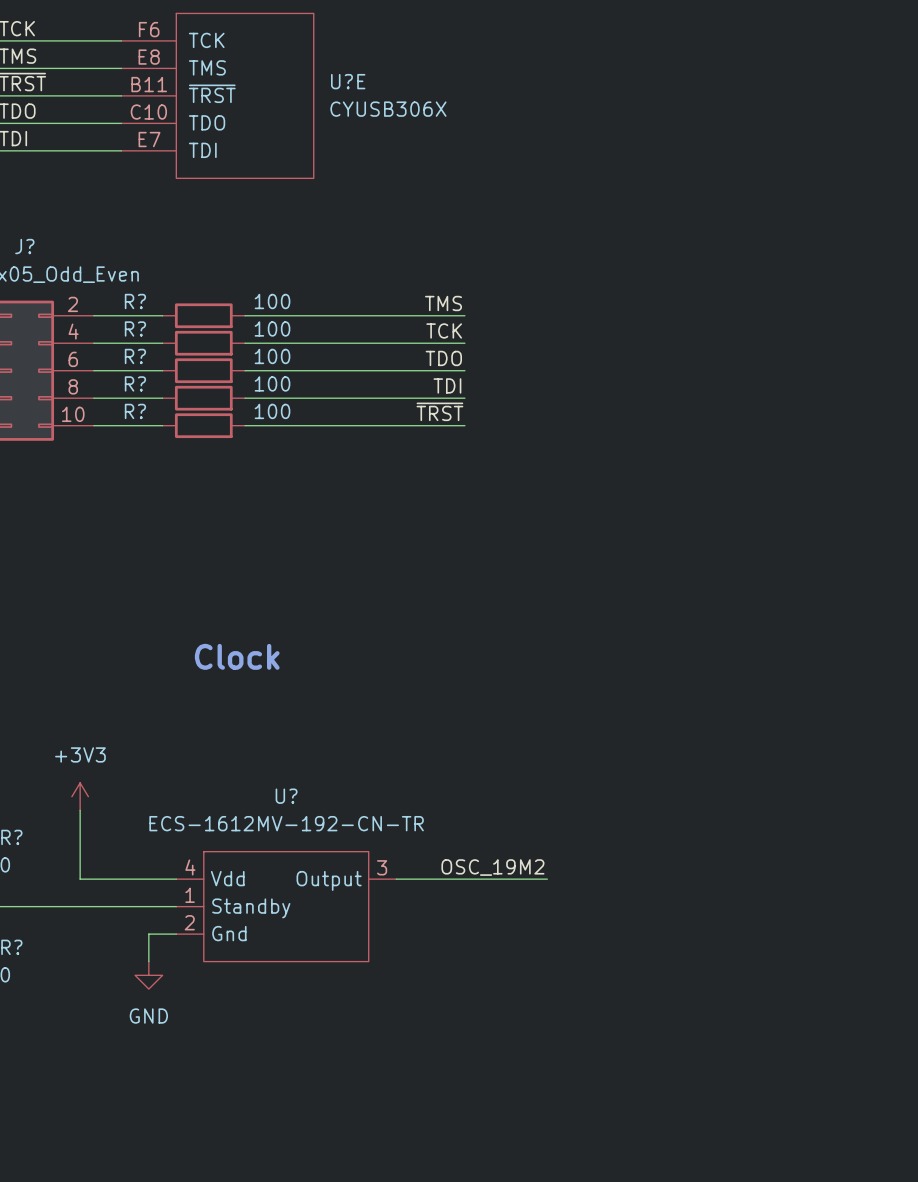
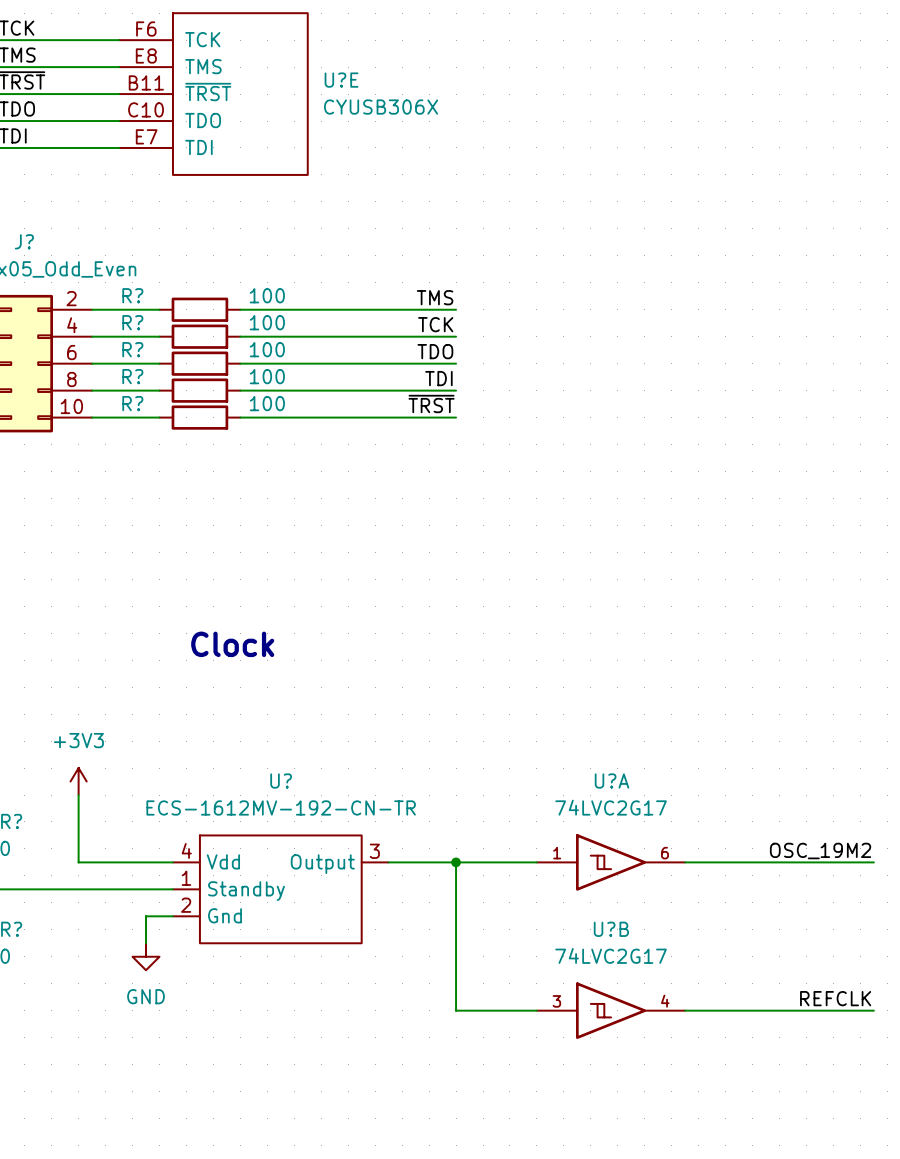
label: OSC_19M2 (492, 867) -> none
label: none -> OSC_19M2 (820, 851)
wire: none -> (456, 862) (456, 1010) (536, 1010)
junction: none -> (456, 862)
U?A: none -> 74LVC2G17 (611, 862)
wire: none -> (685, 862) (873, 862)
label: none -> REFCLK (835, 998)
U?B: none -> 74LVC2G17 (611, 1010)
wire: none -> (685, 1010) (873, 1010)

